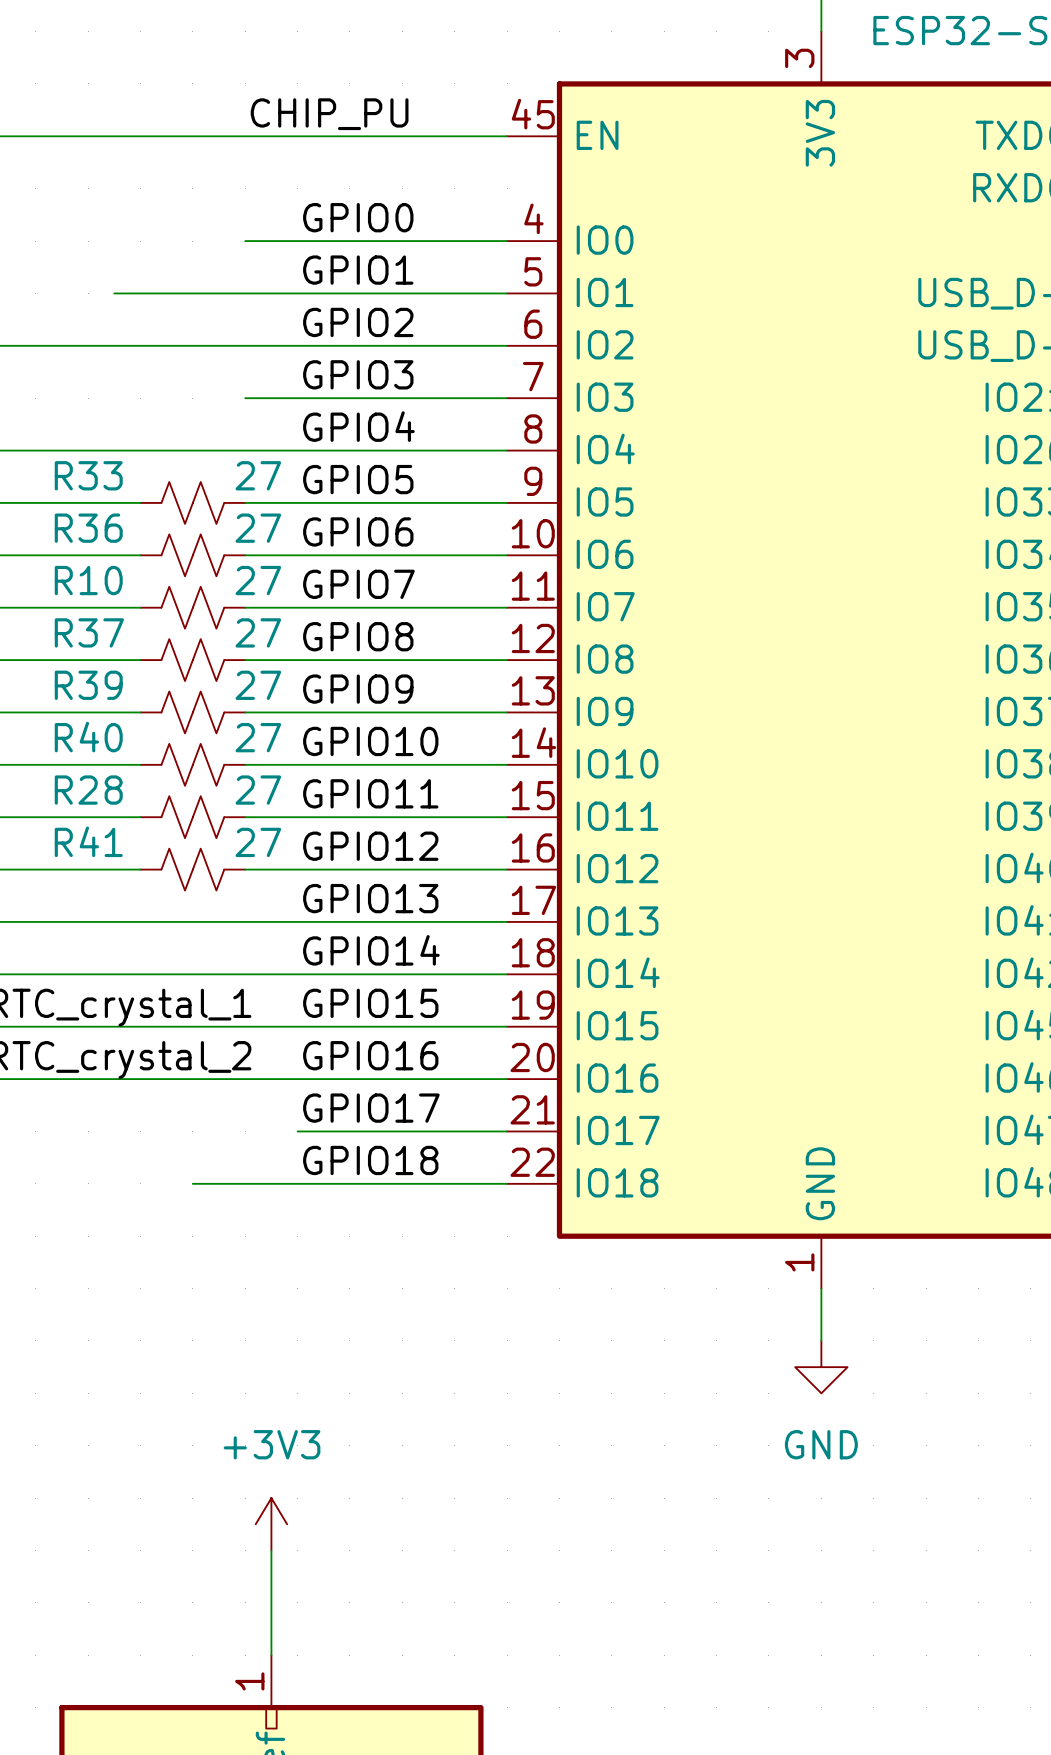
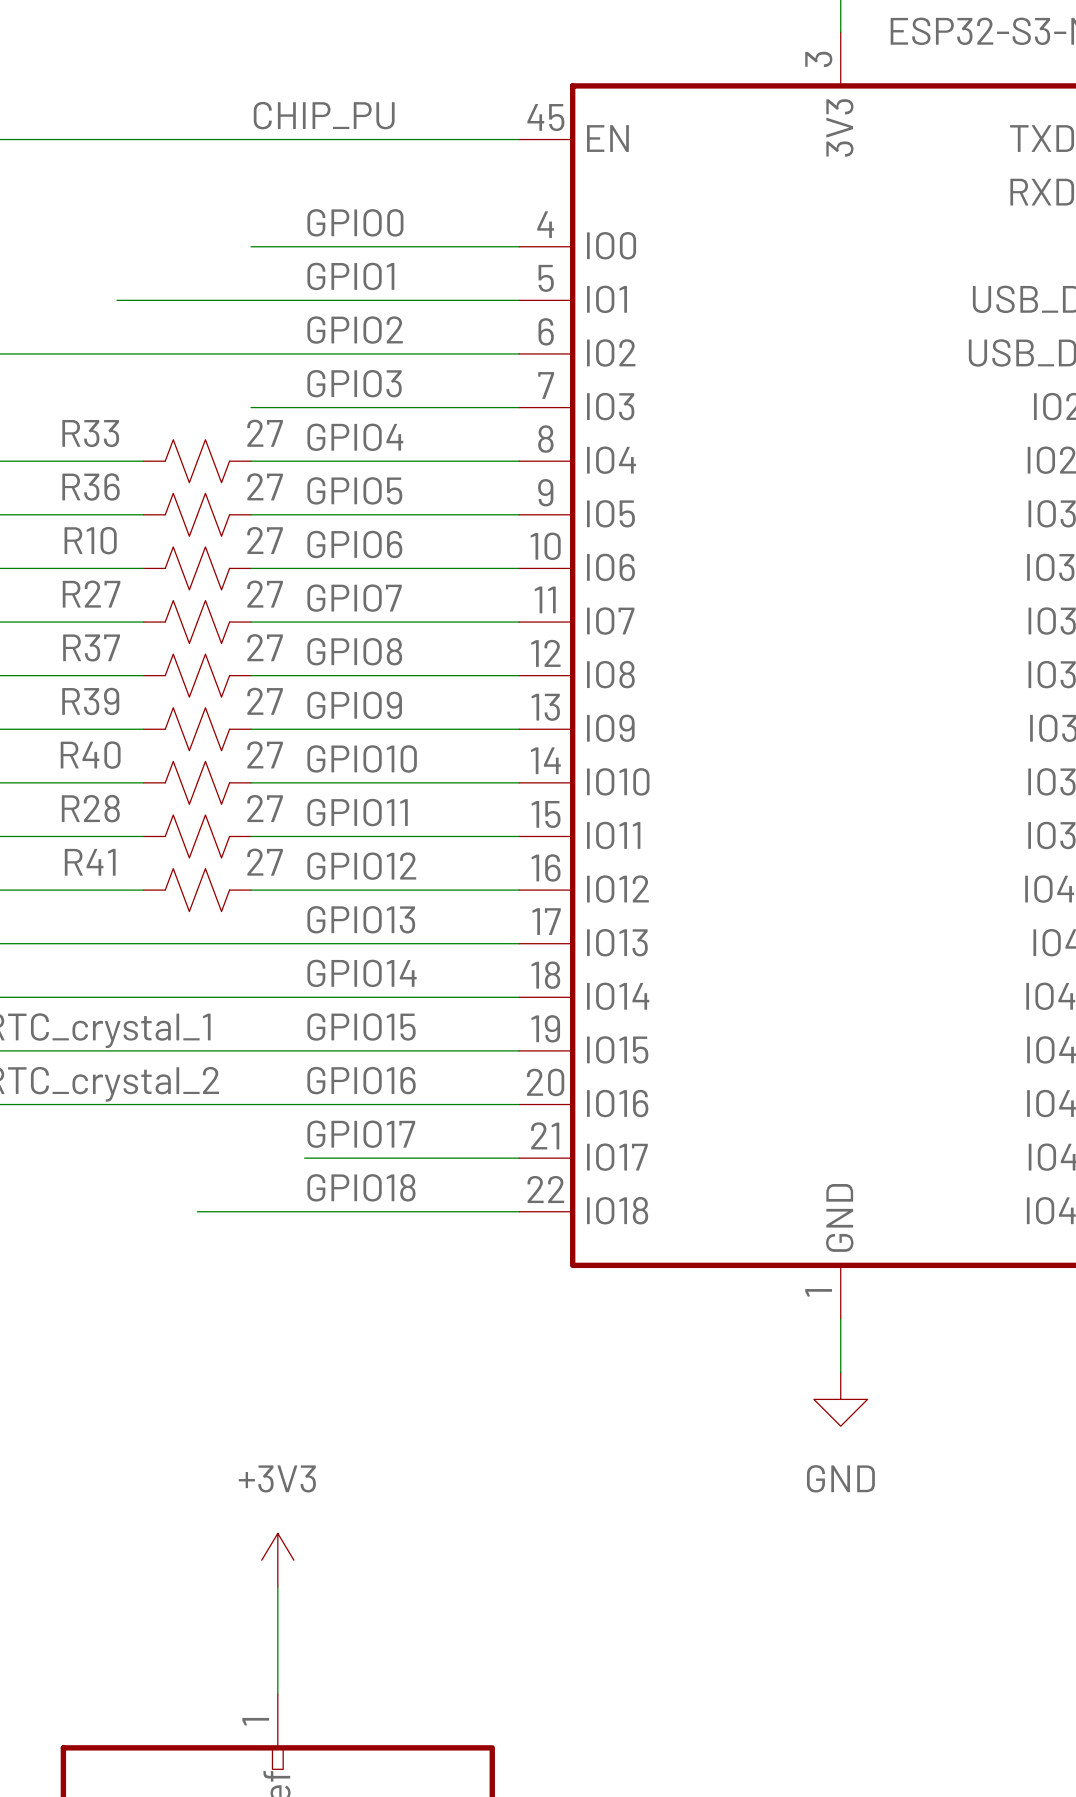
wire: (140, 450) (245, 450) -> none
R33: none -> 27 (197, 461)
R33 name: R33 (88, 475) -> R36 (91, 487)
R36 name: R36 (88, 528) -> R10 (90, 540)
R10 name: R10 (88, 580) -> R27 (91, 594)

